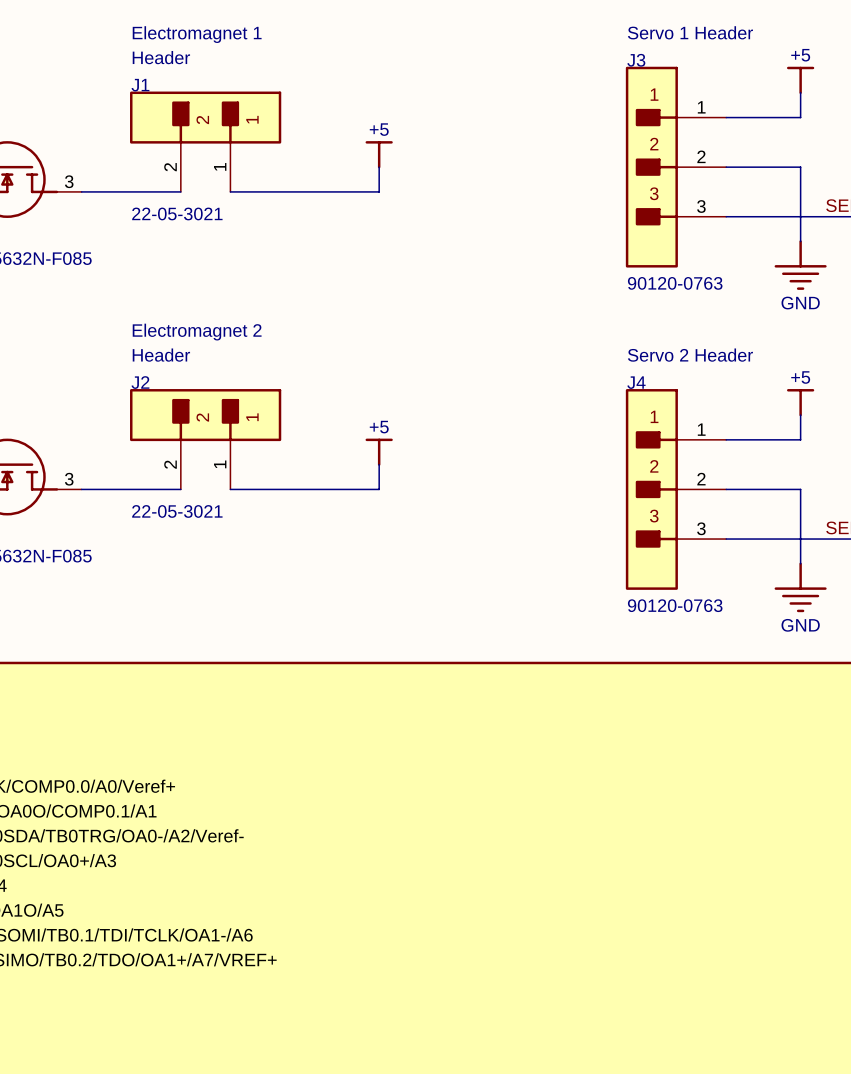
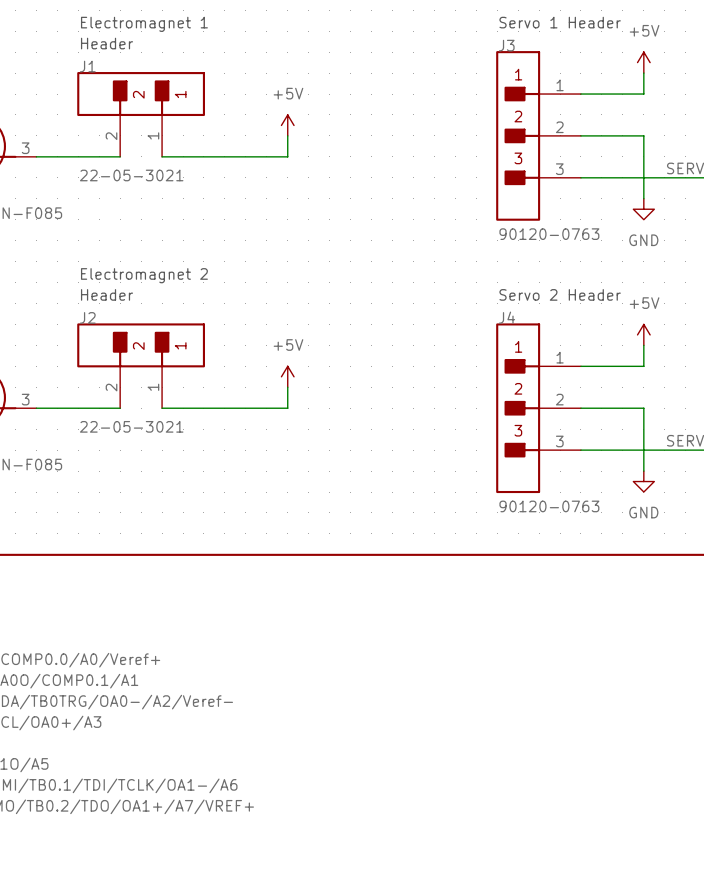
power symbol: +5 (800, 80) -> +5V (643, 62)
power symbol: +5 (379, 154) -> +5V (287, 125)
power symbol: none -> GND (643, 209)
power symbol: GND (800, 265) -> none
power symbol: +5 (800, 402) -> +5V (643, 334)
power symbol: +5 (379, 452) -> +5V (287, 376)
power symbol: none -> GND (643, 481)
power symbol: GND (800, 587) -> none

